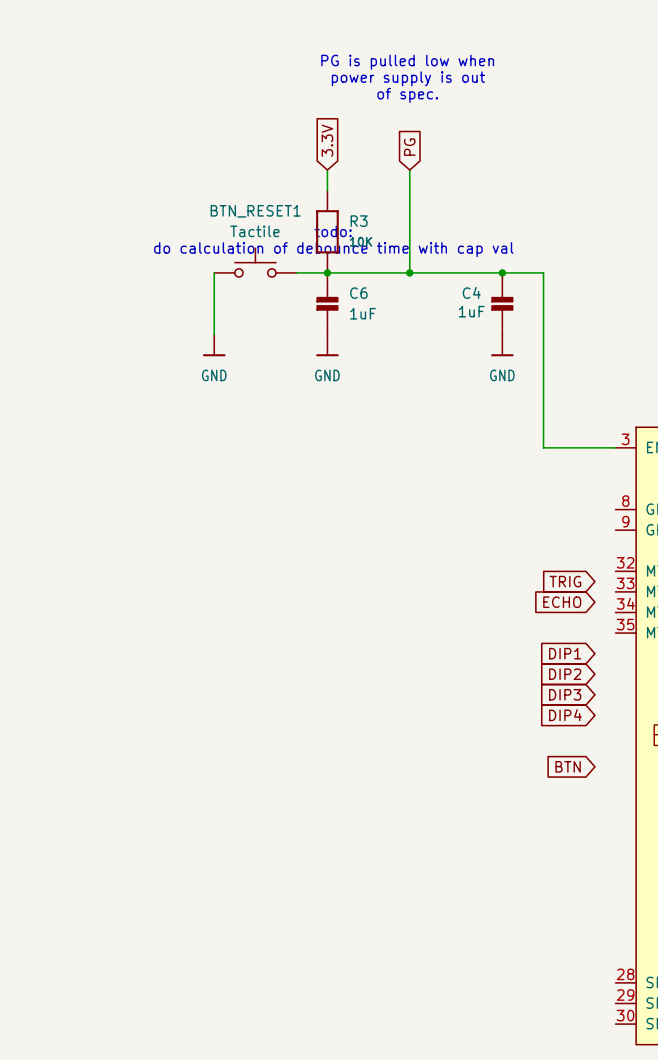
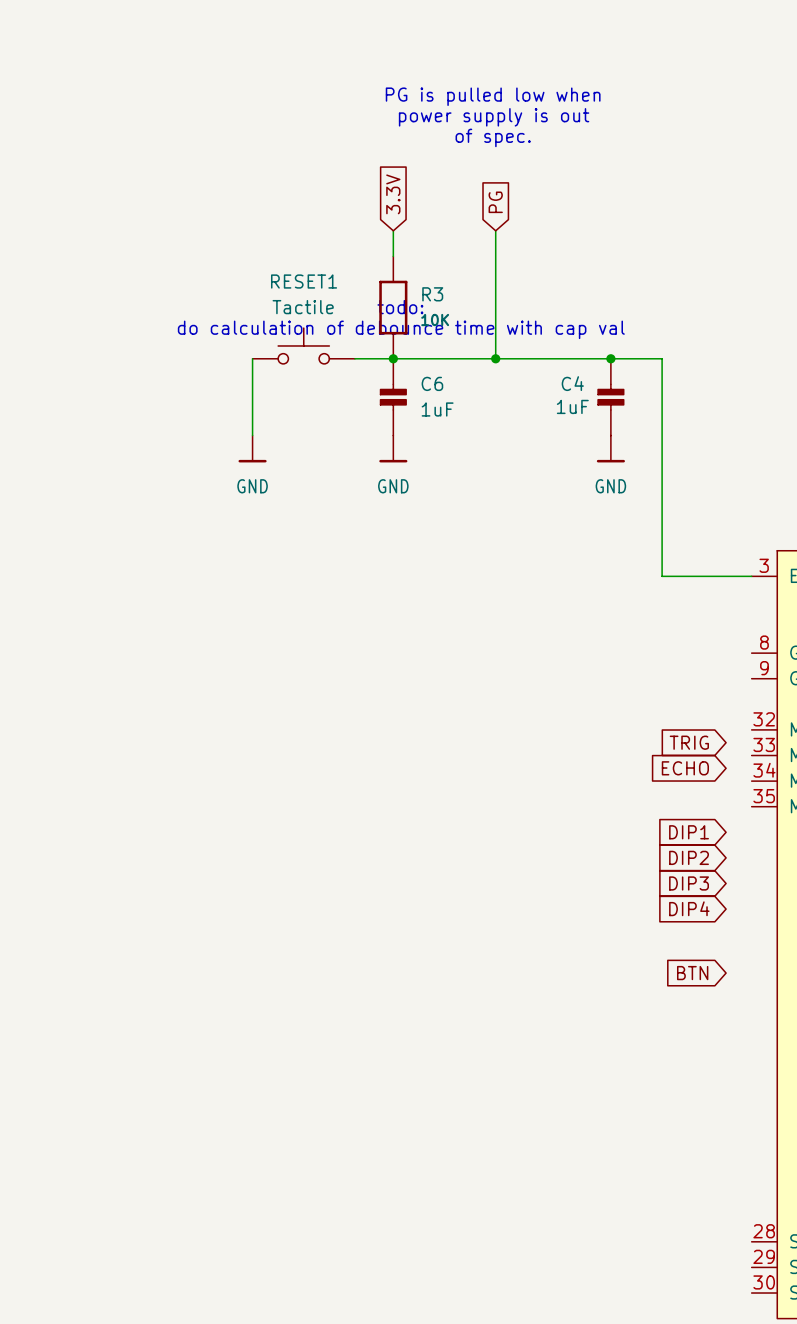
BTN_RESET1 name: BTN_RESET1 (255, 211) -> RESET1 (304, 281)

